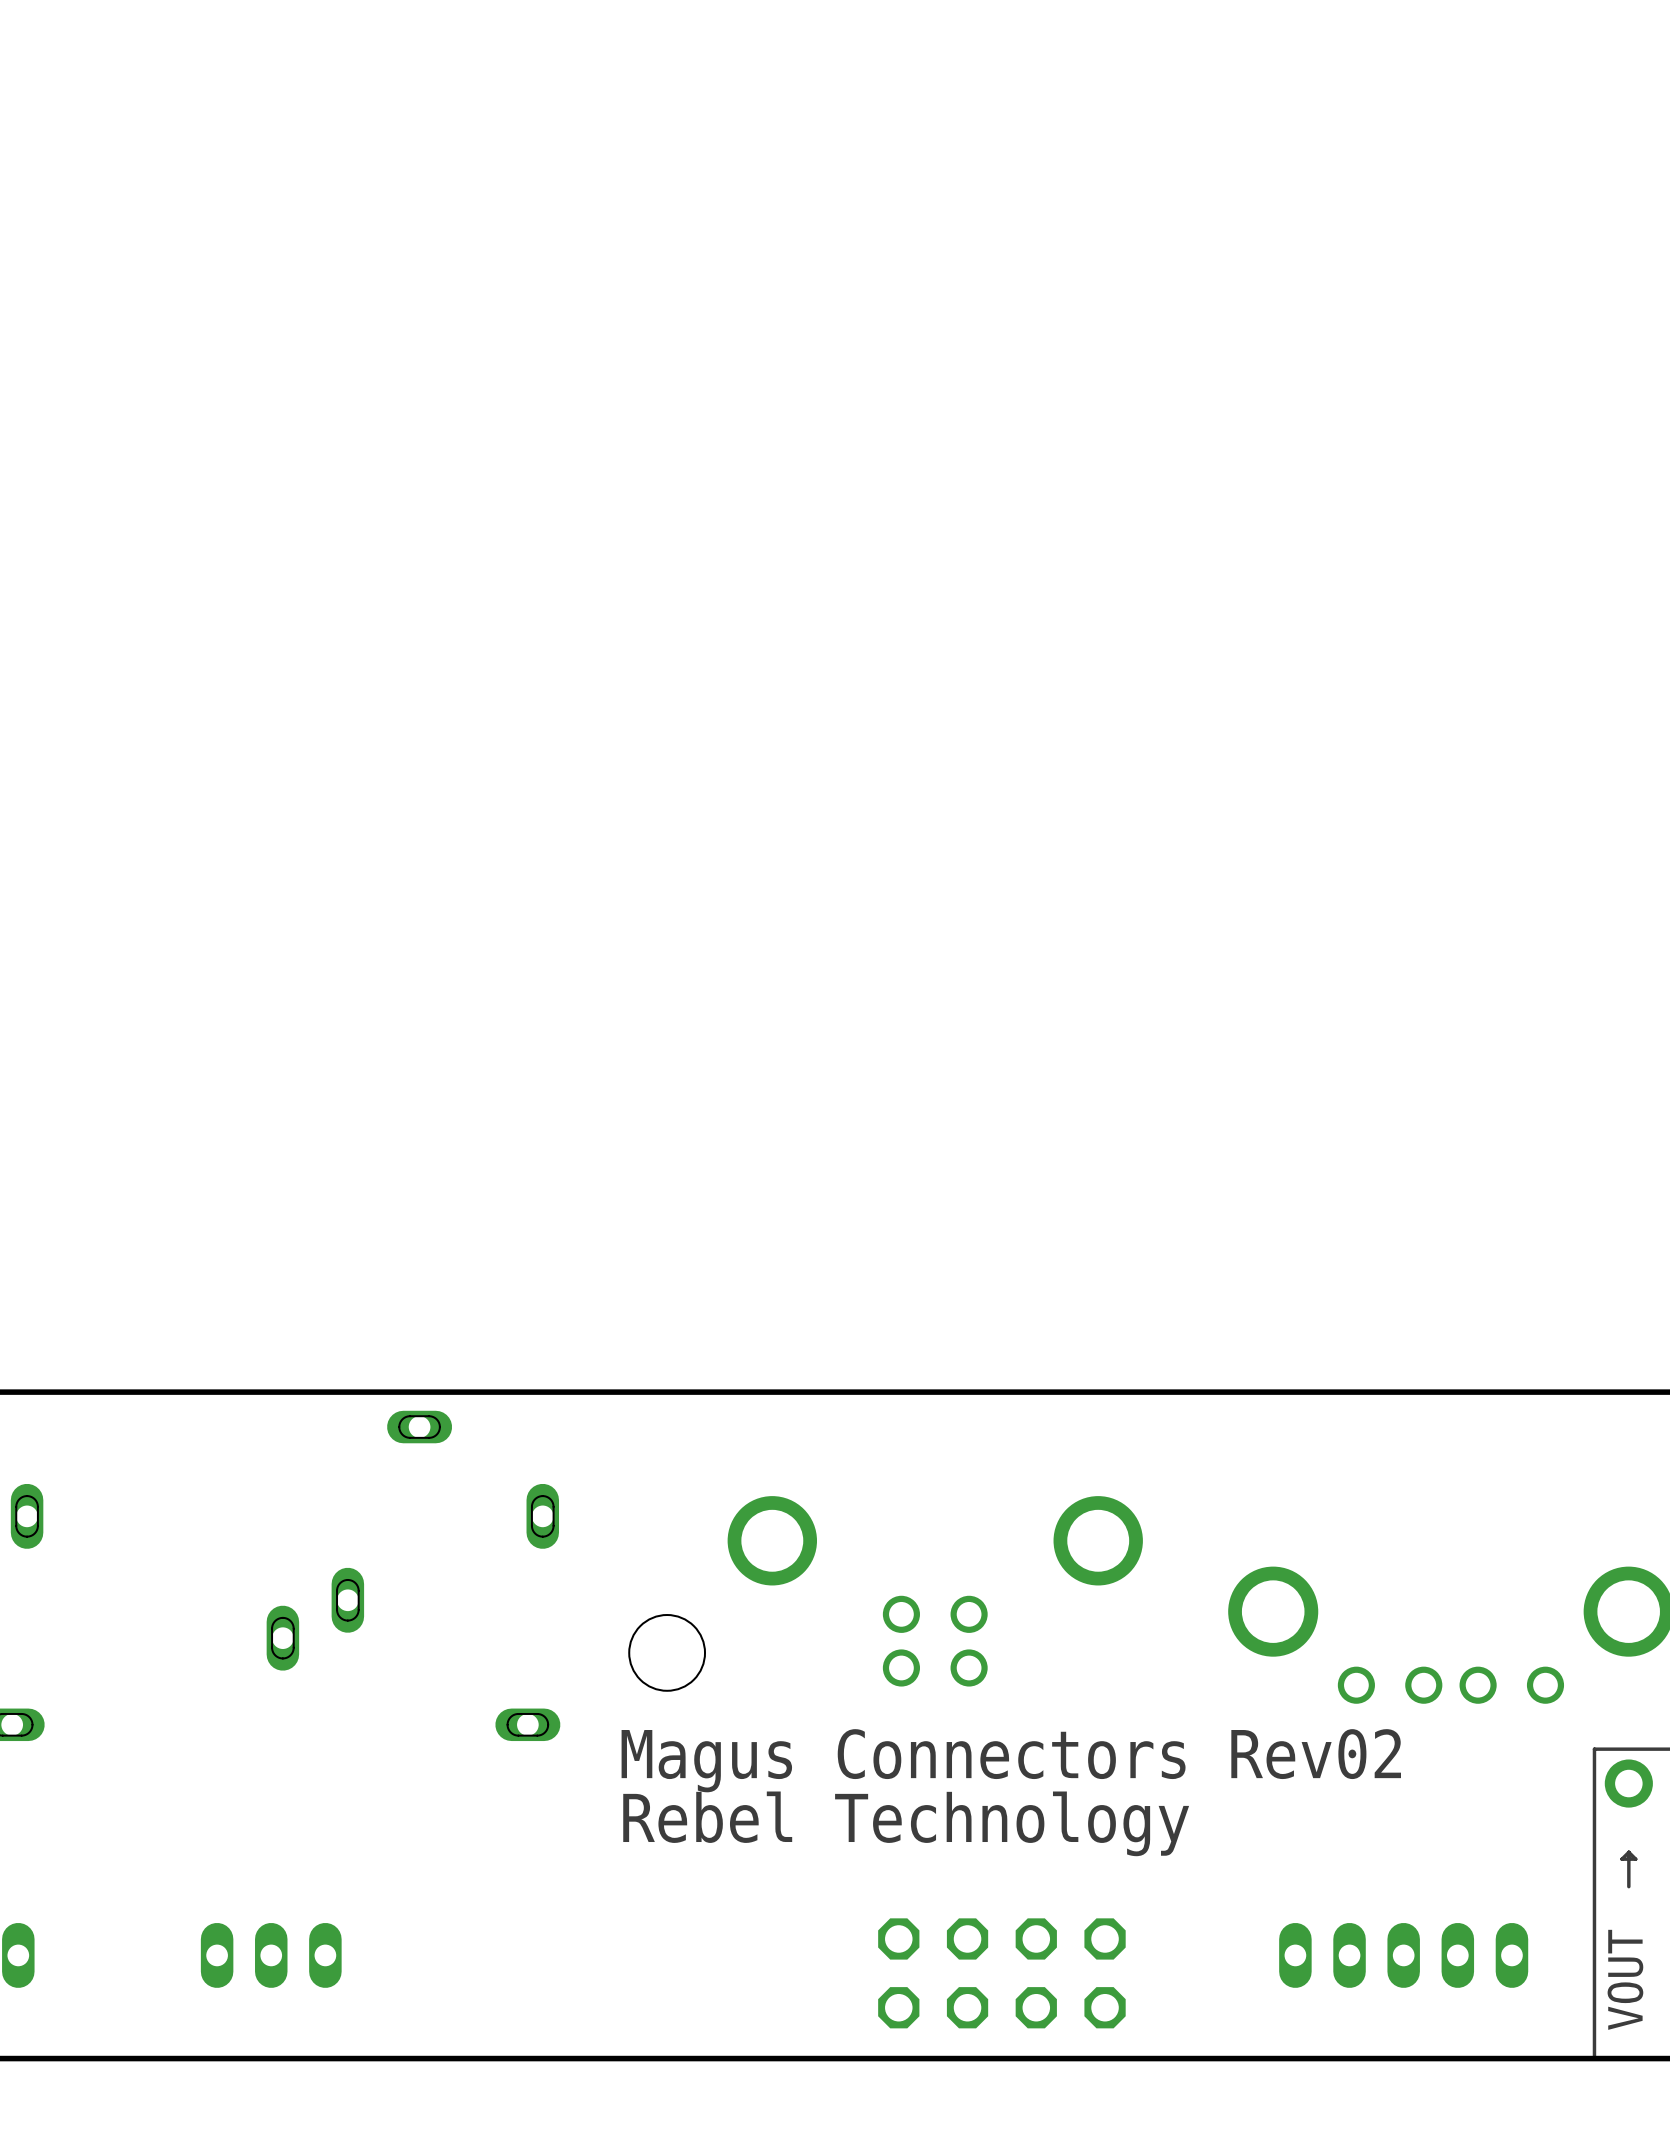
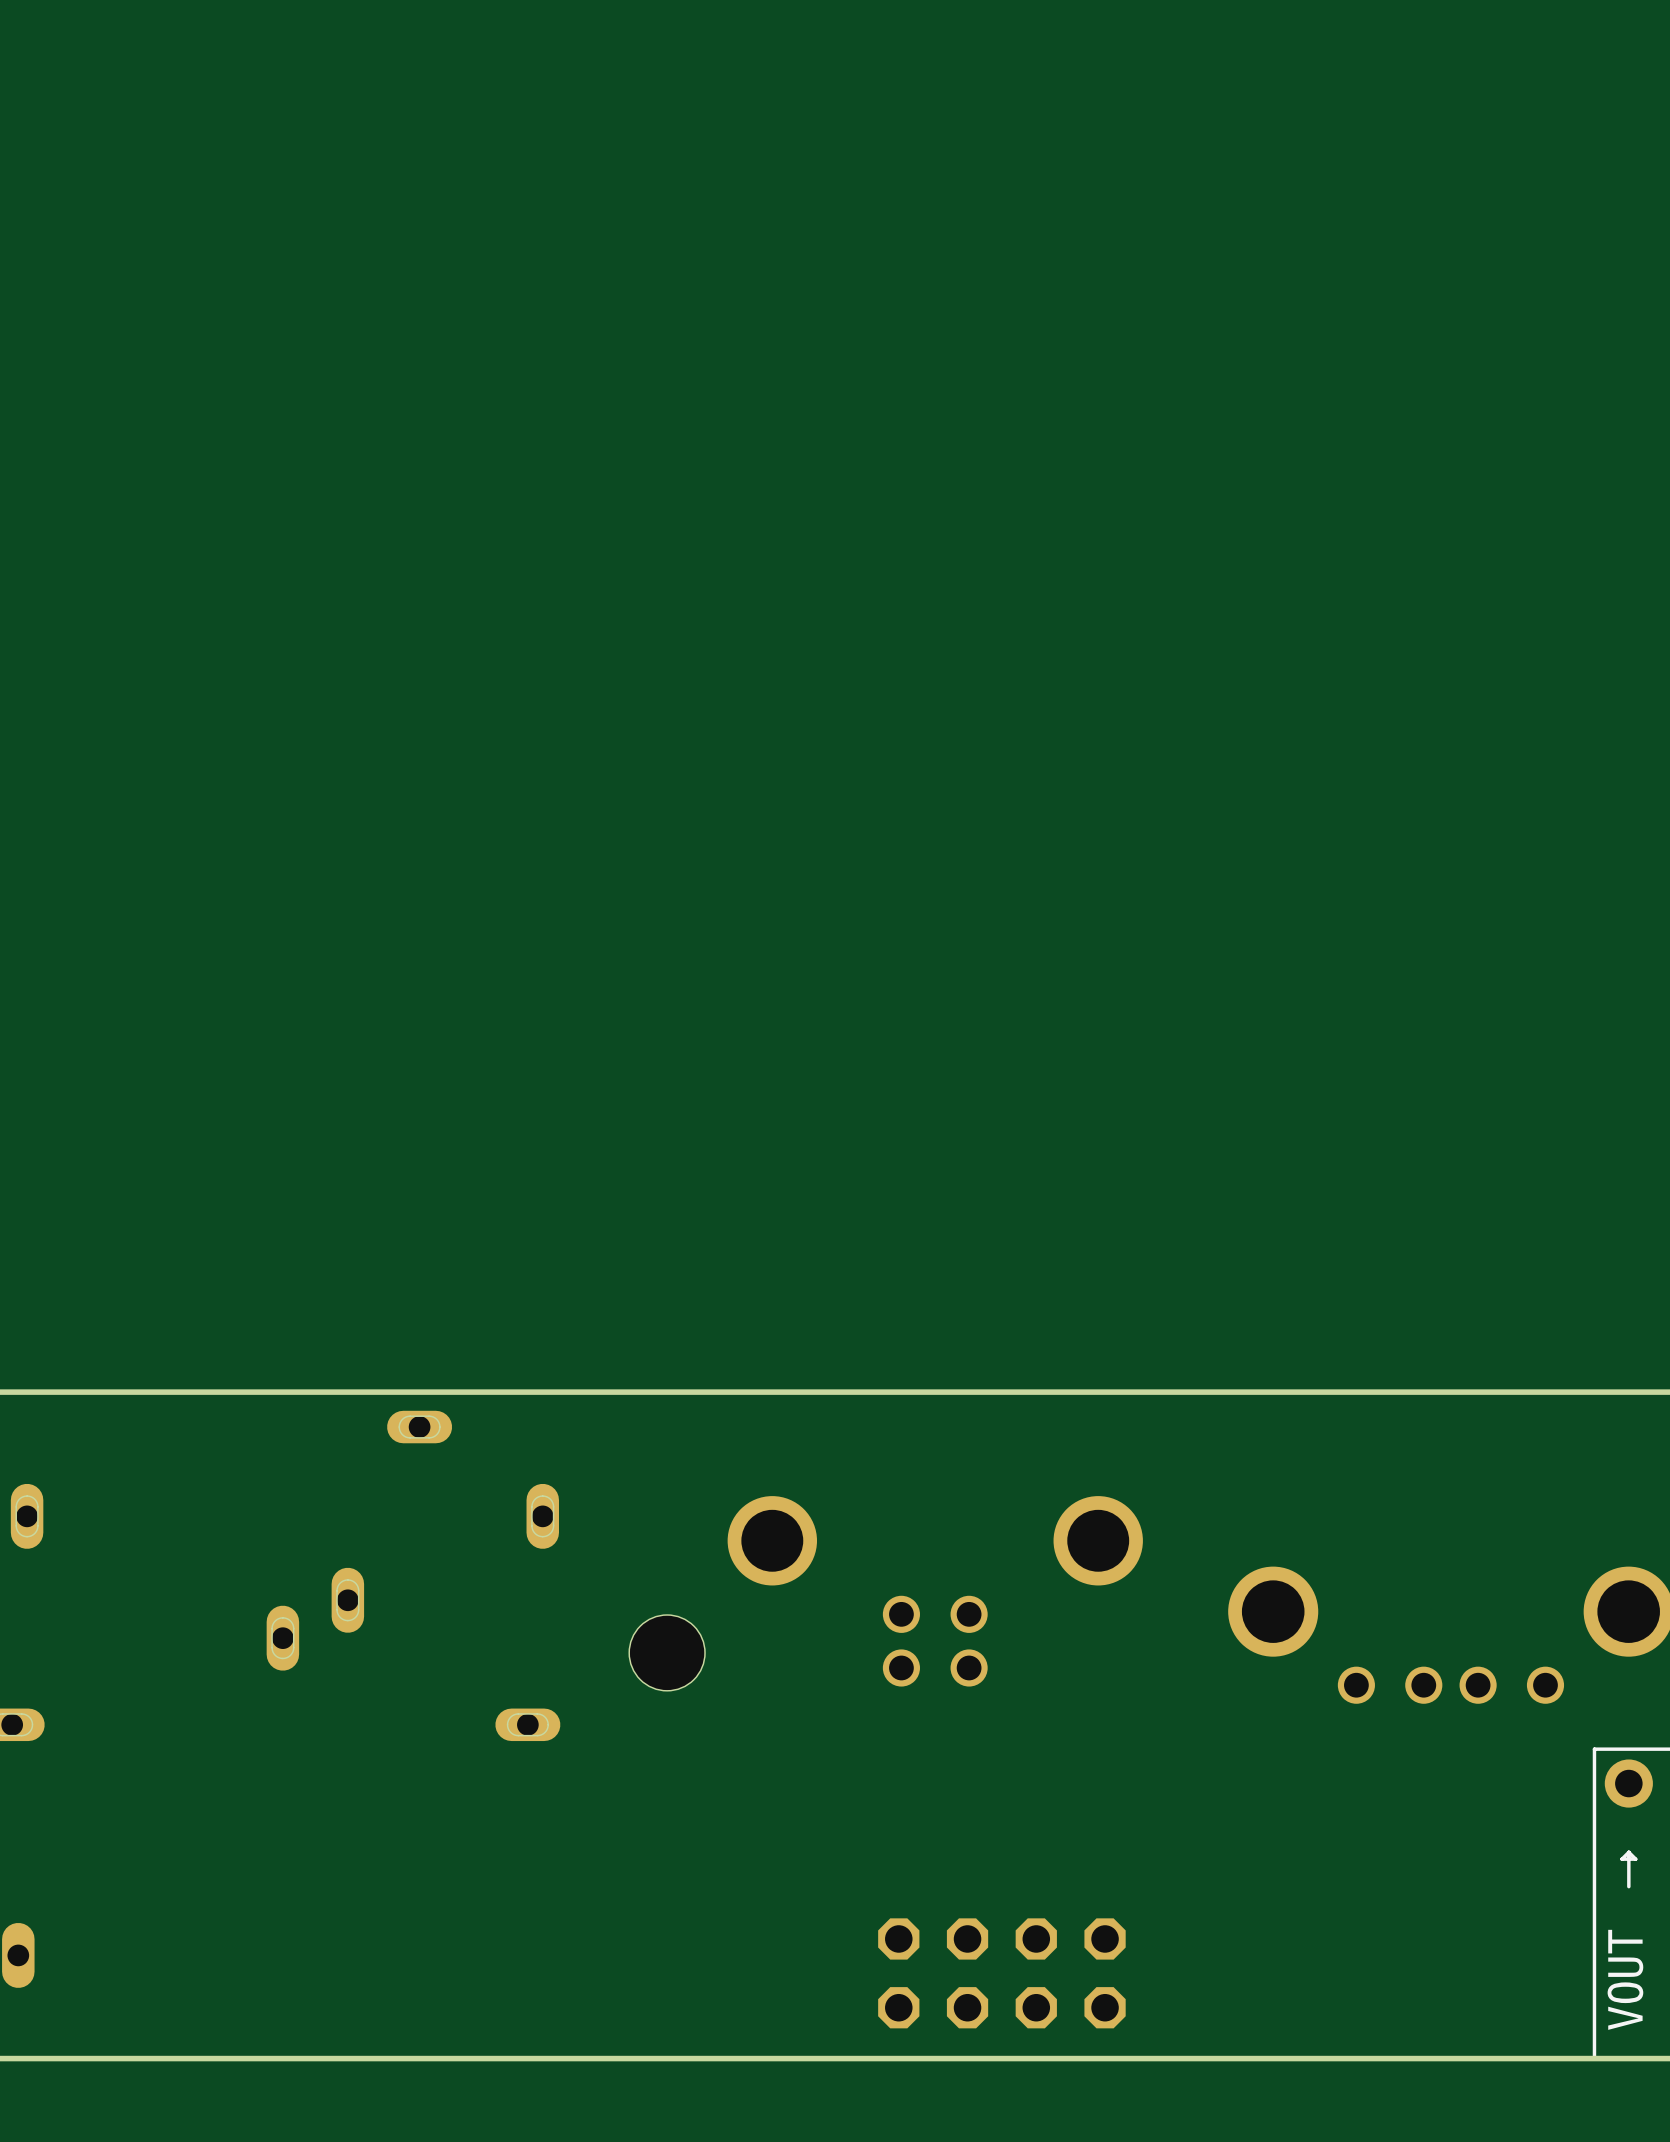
text: Magus Connectors Rev02 (1011, 1760) -> none
text: Rebel Technology (906, 1823) -> none
part: (271, 1955) -> none
part: (1403, 1955) -> none

